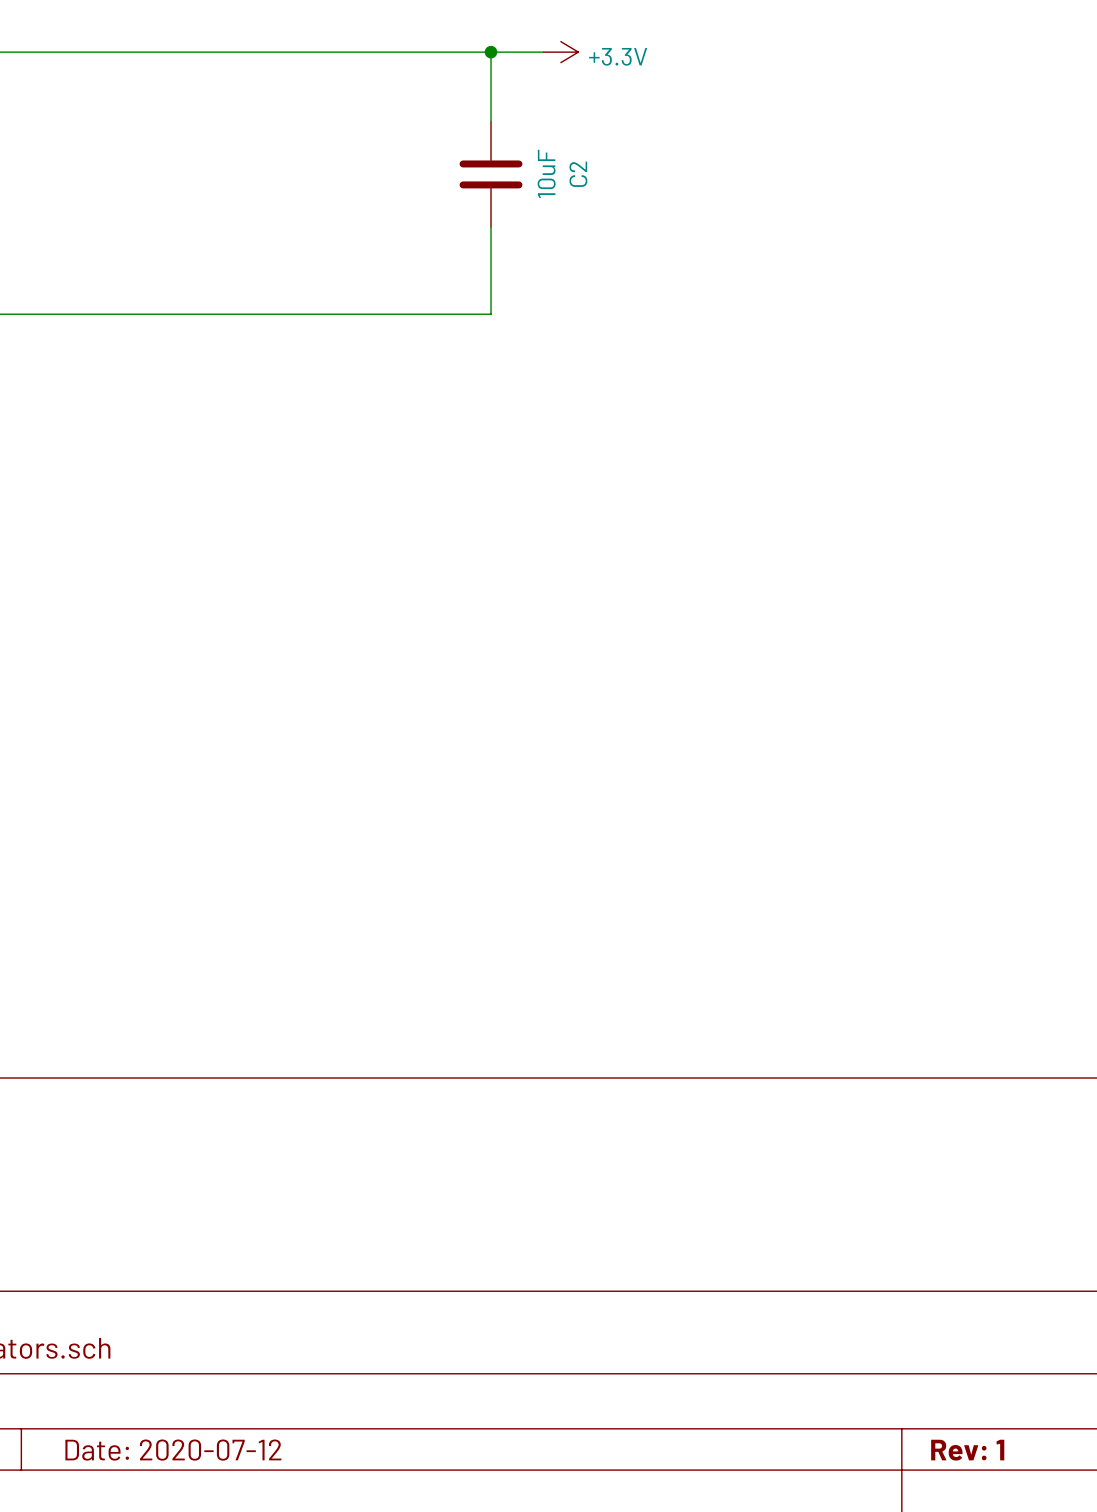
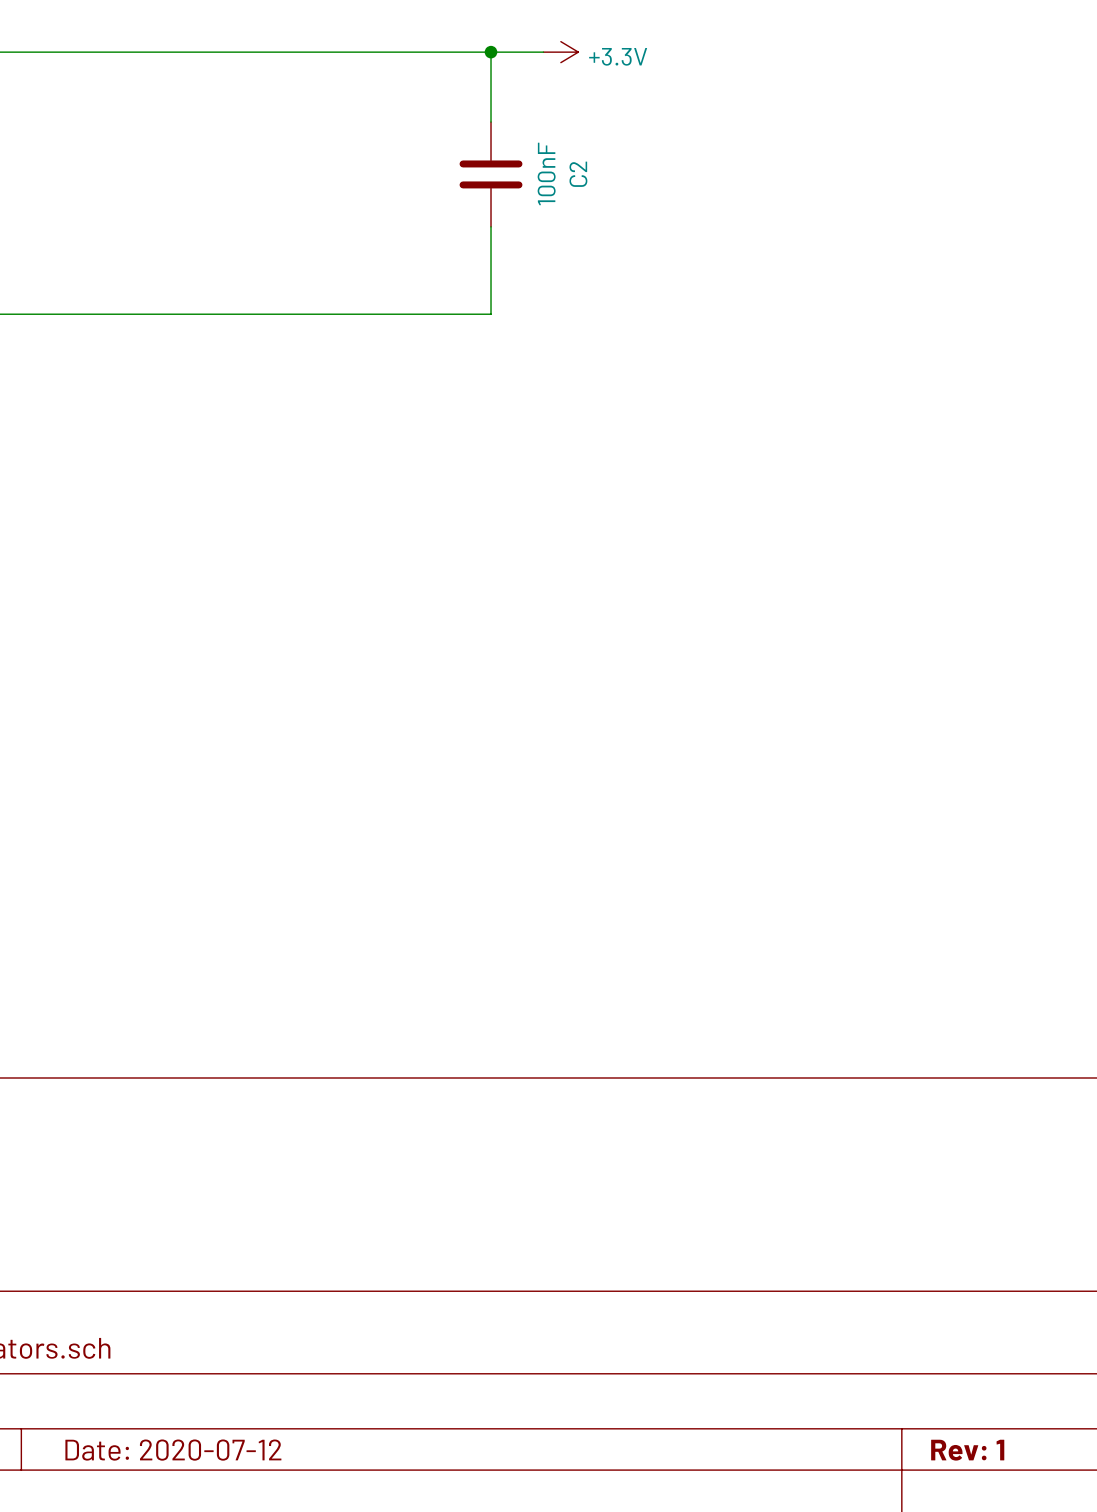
C2 value: 10uF (546, 173) -> 100nF (546, 173)

